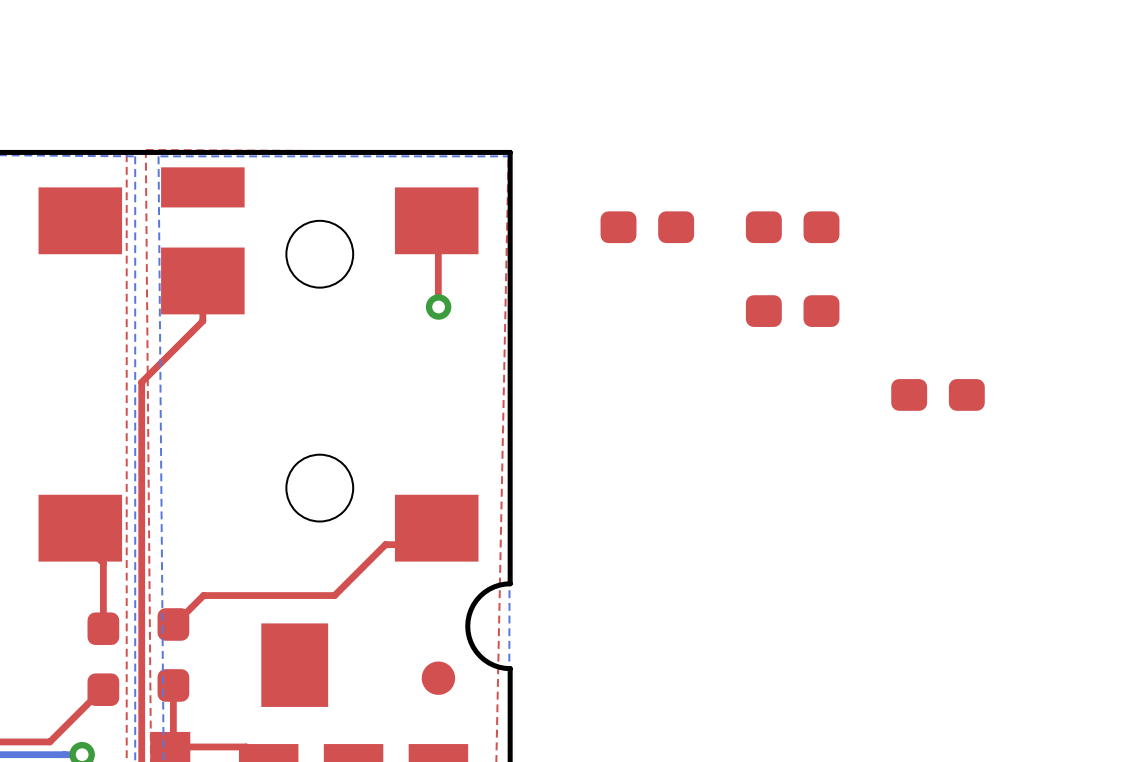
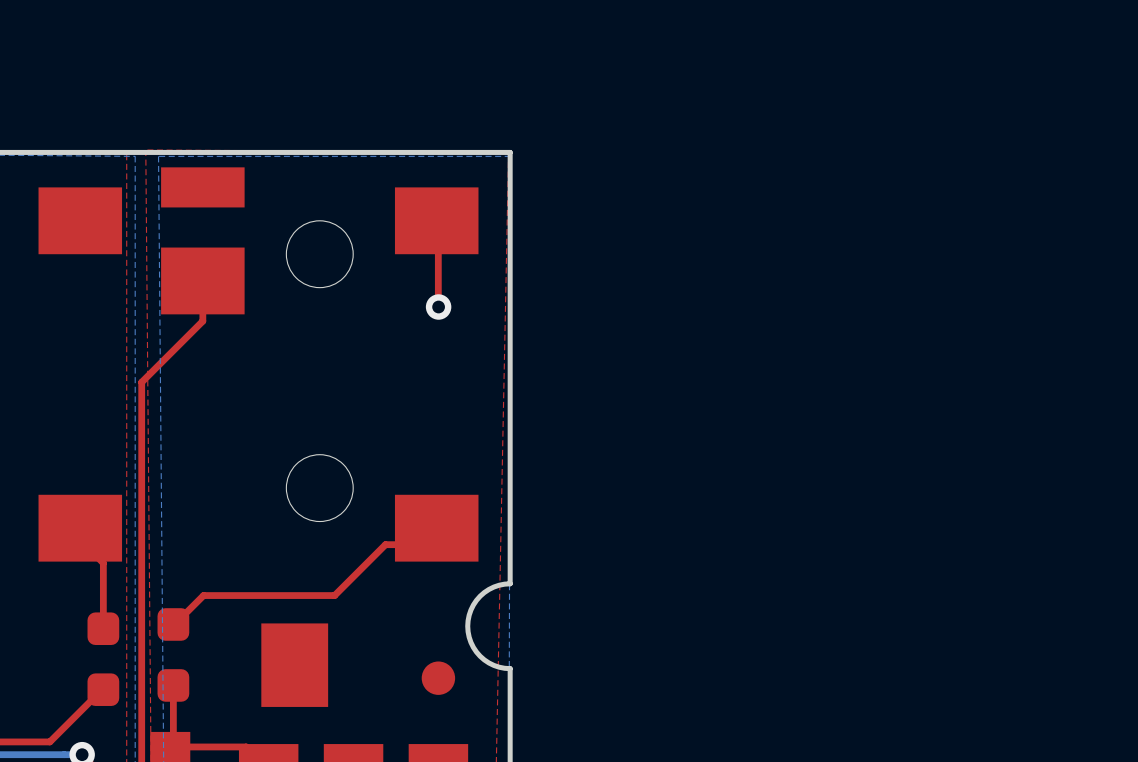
part: (647, 227) -> none
part: (792, 227) -> none
part: (792, 311) -> none
part: (938, 394) -> none

